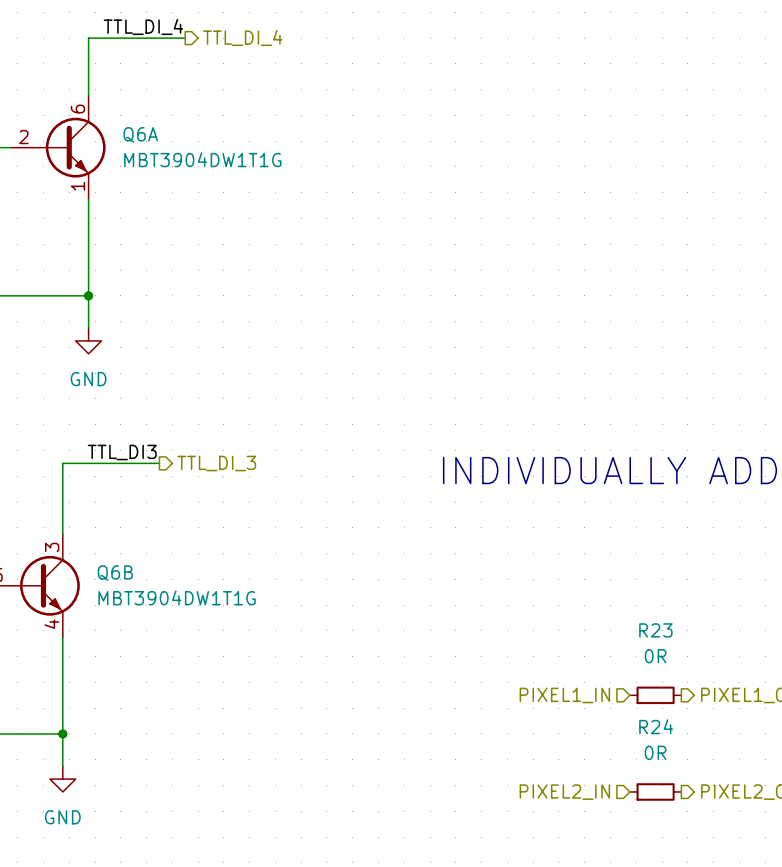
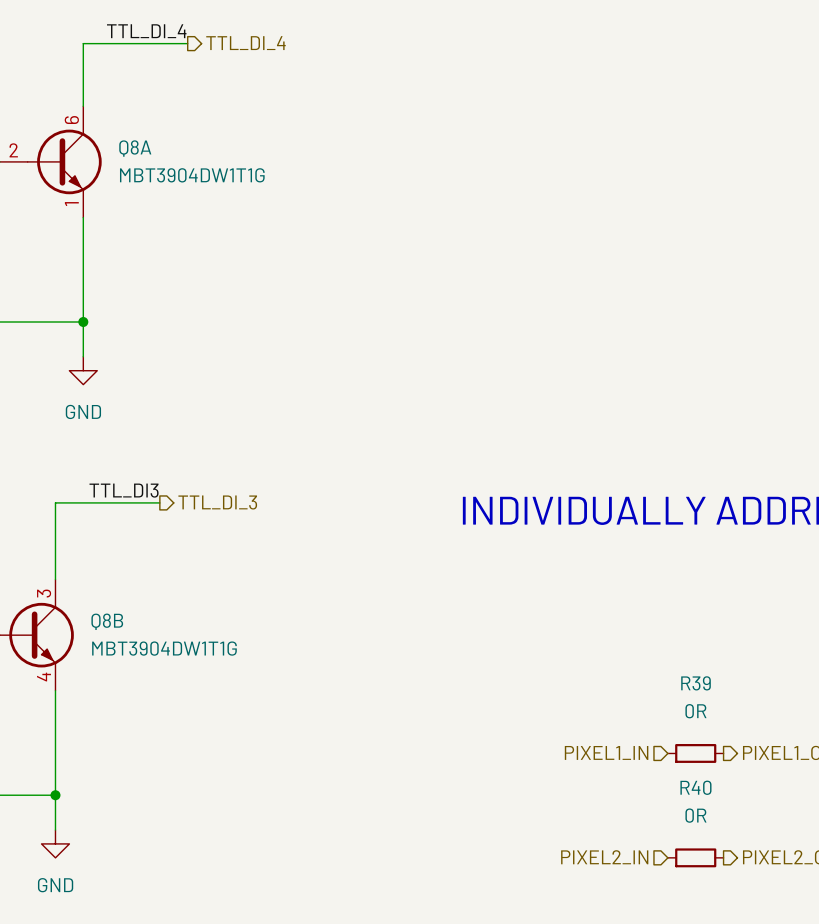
Q6A name: Q6A (140, 134) -> Q8A (135, 148)
Q6B name: Q6B (115, 573) -> Q8B (107, 621)
R23 name: R23 (655, 630) -> R39 (696, 683)
R24 name: R24 (656, 726) -> R40 (695, 787)

